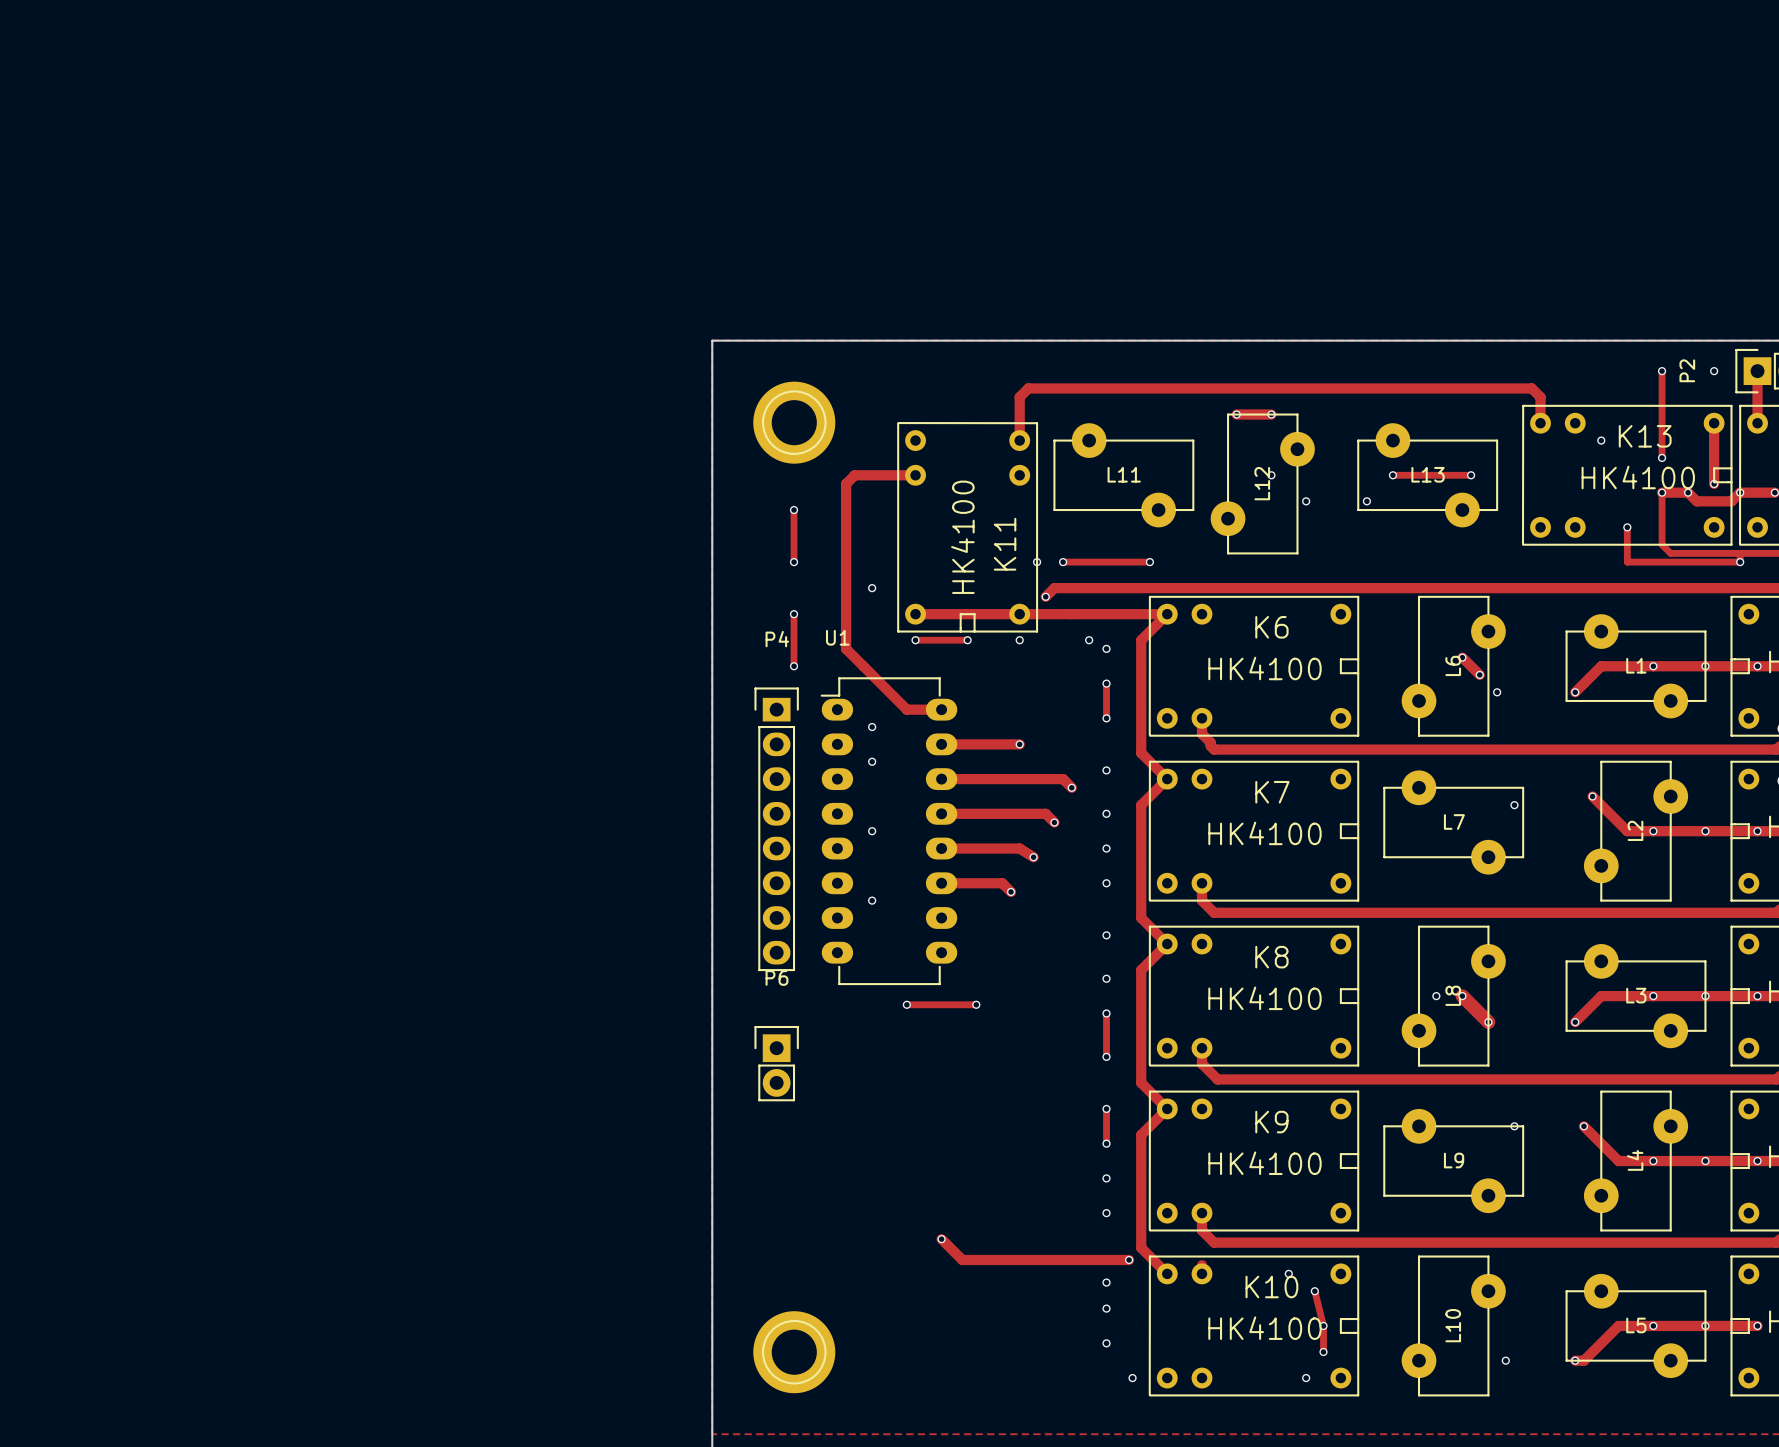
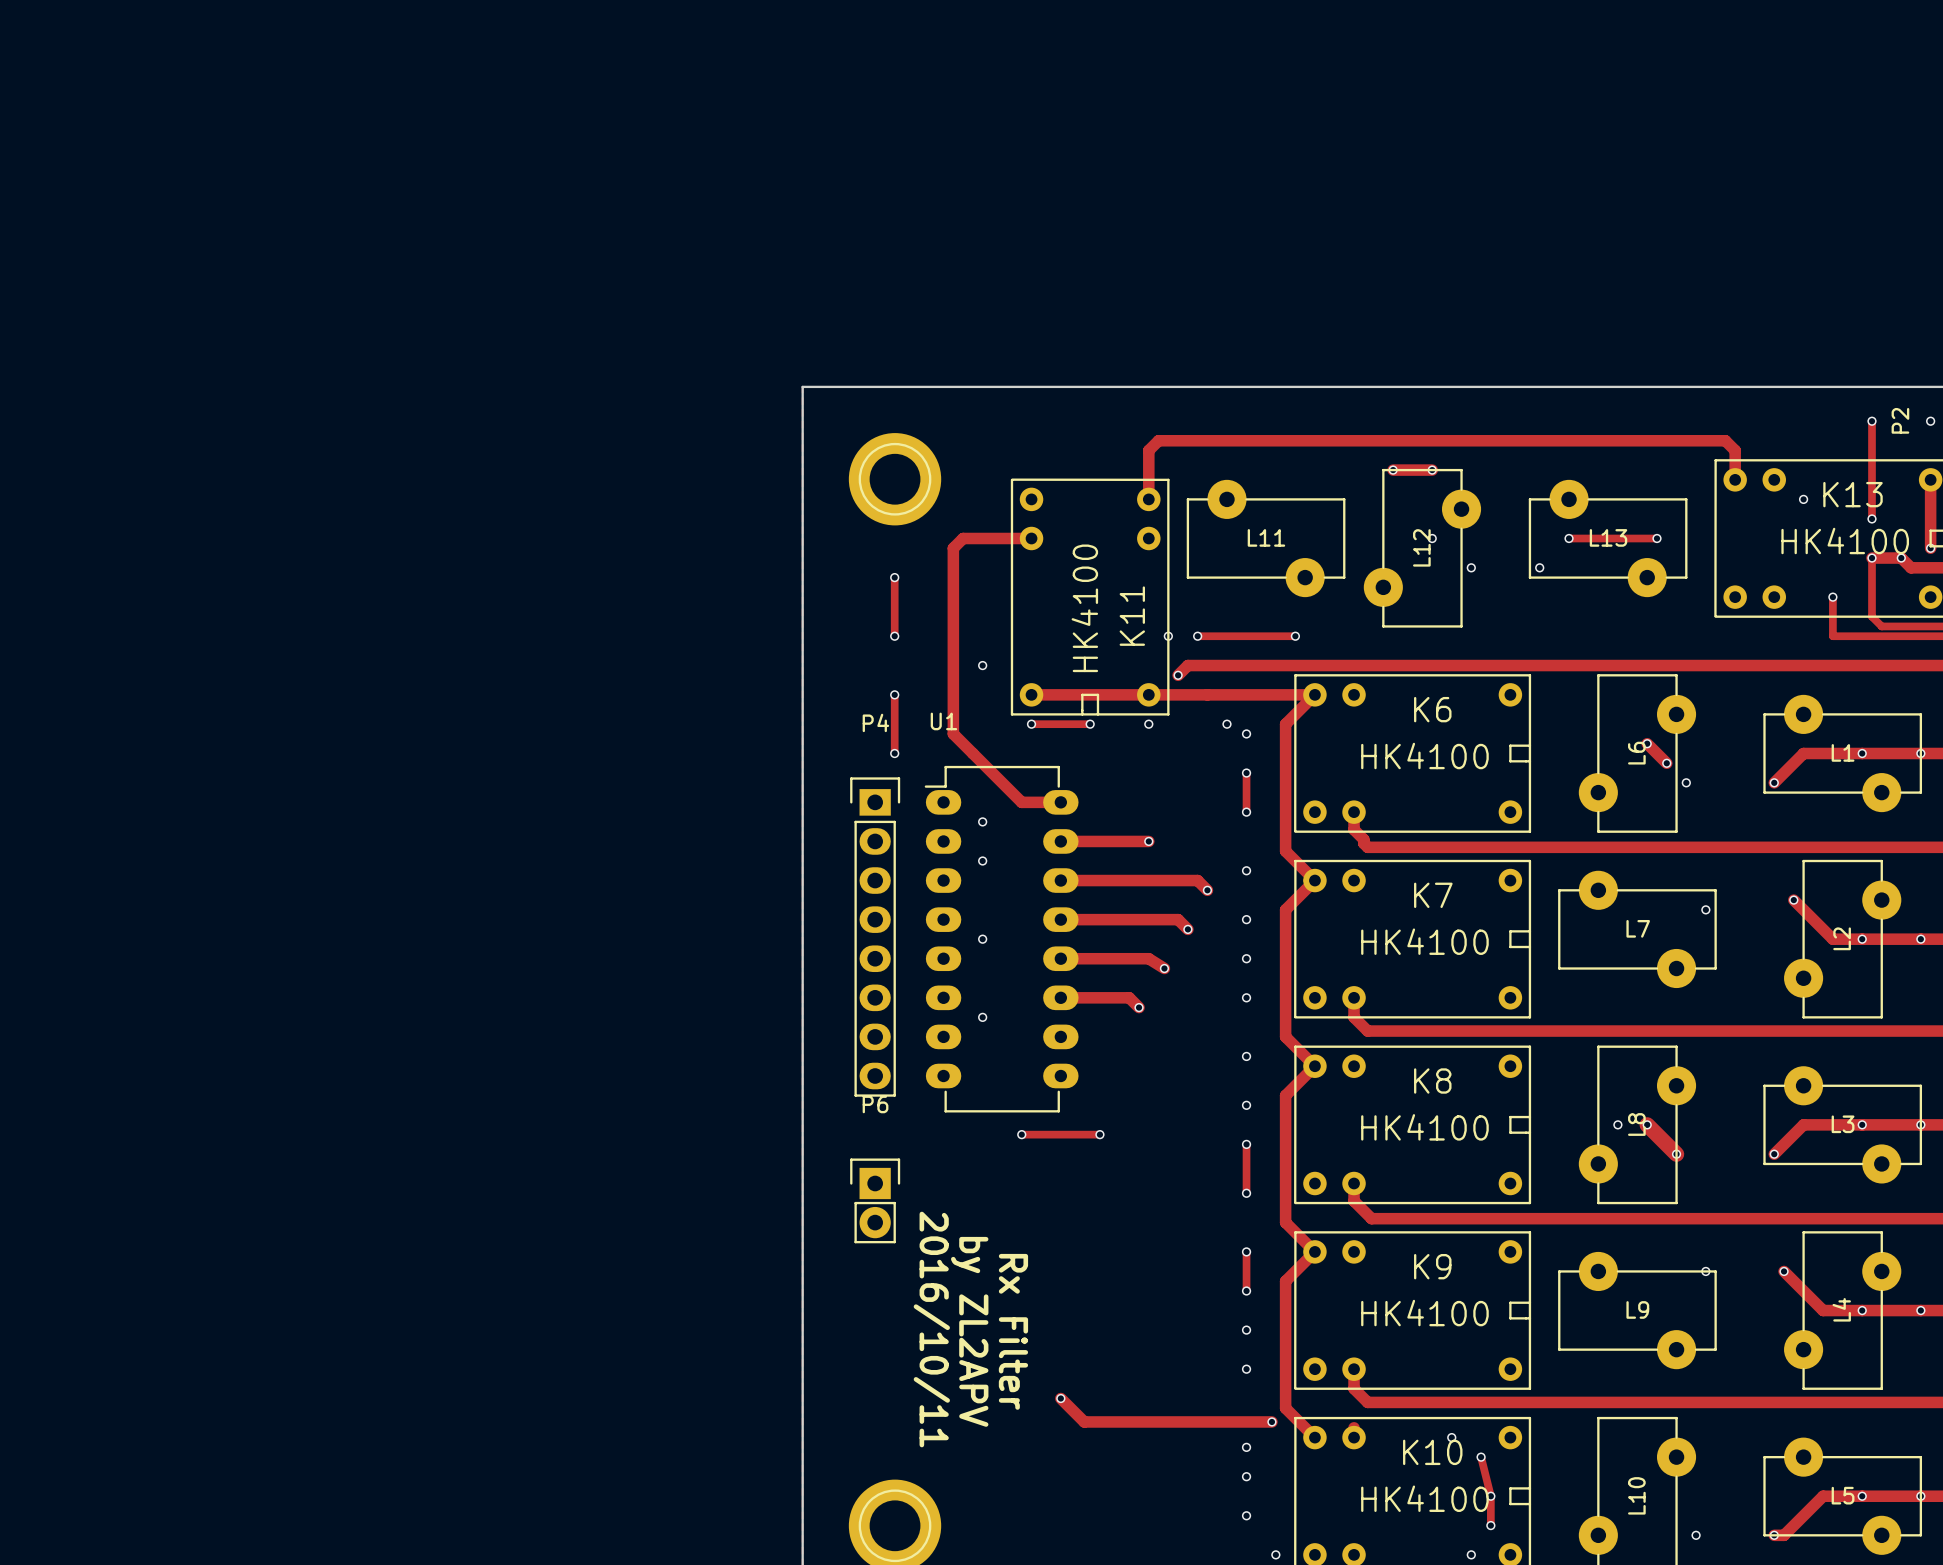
text: none -> 2016/10/11 (931, 1329)
text: none -> by ZL2APV (969, 1331)
text: none -> Rx Filter (1013, 1331)

